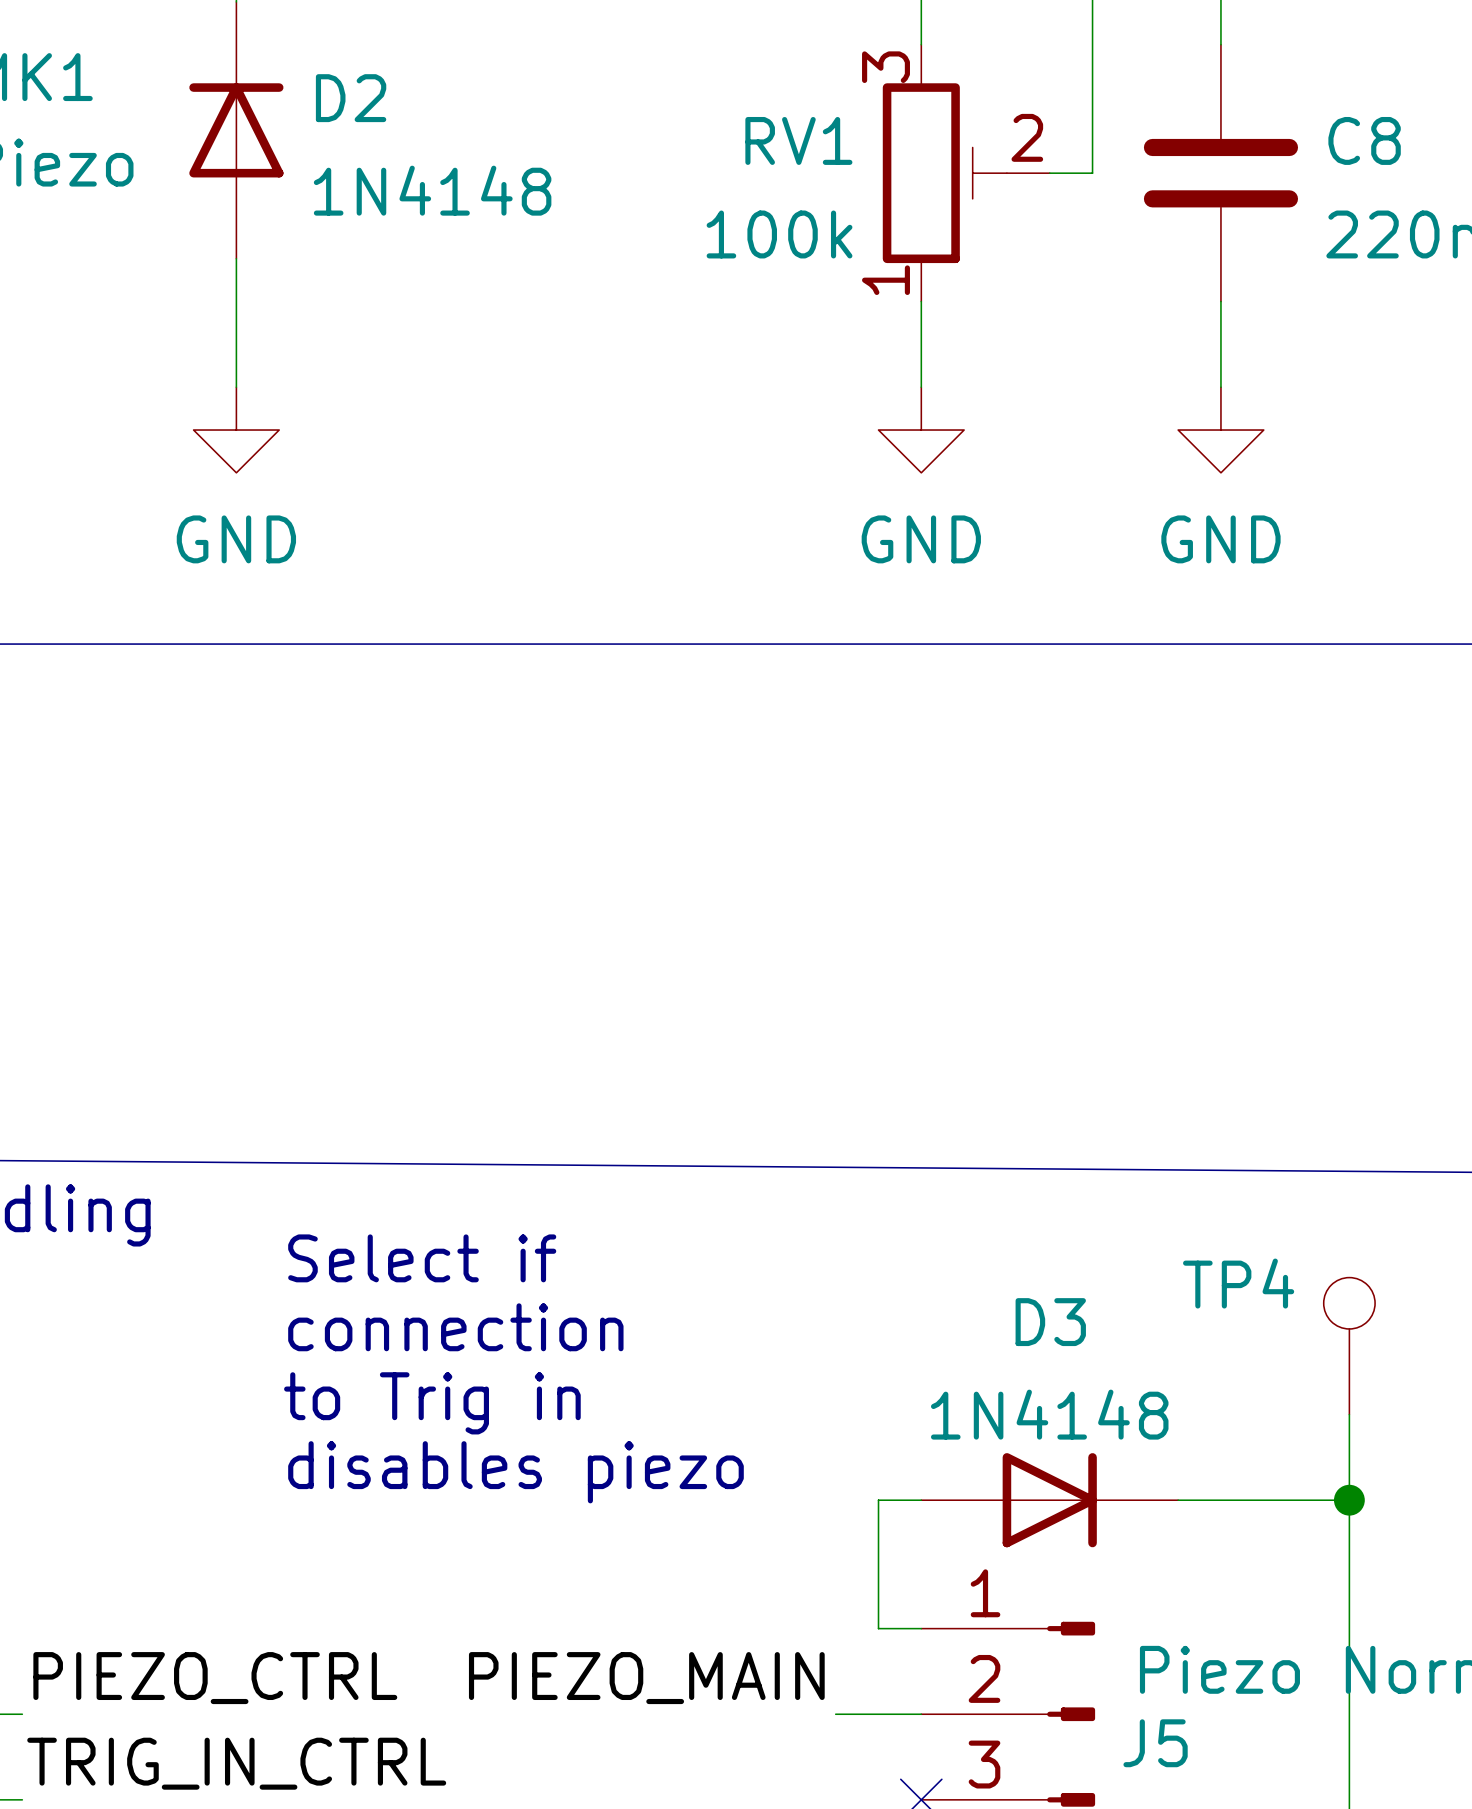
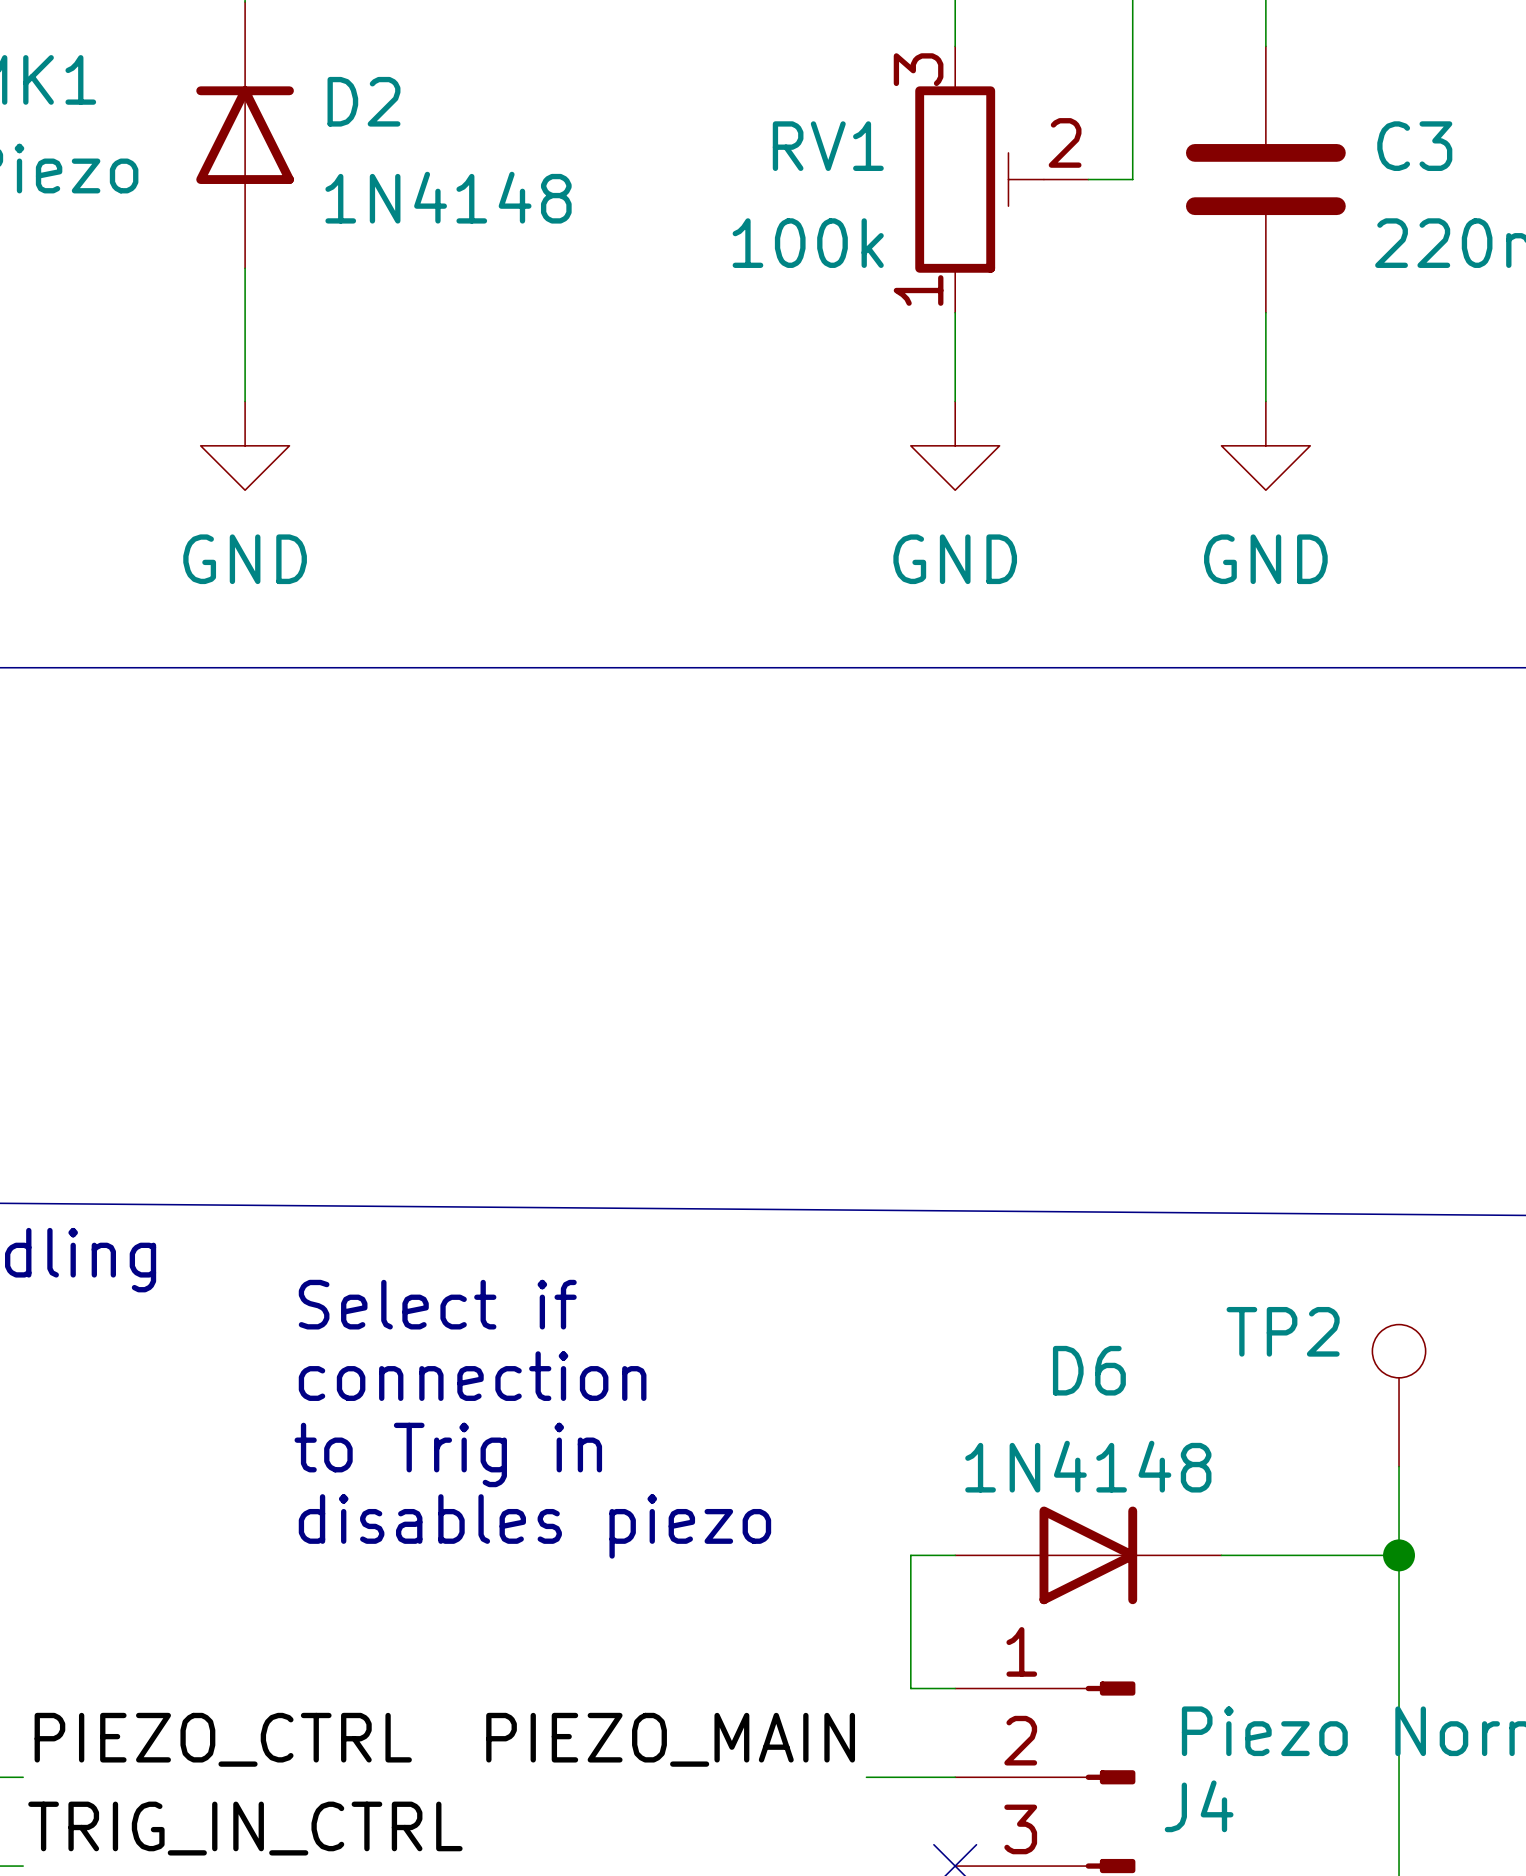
C8 name: C8 (1364, 140) -> C3 (1414, 146)
TP4 name: TP4 (1238, 1283) -> TP2 (1283, 1331)
D3 name: D3 (1050, 1322) -> D6 (1089, 1370)
J5 name: J5 (1155, 1743) -> J4 (1199, 1806)

